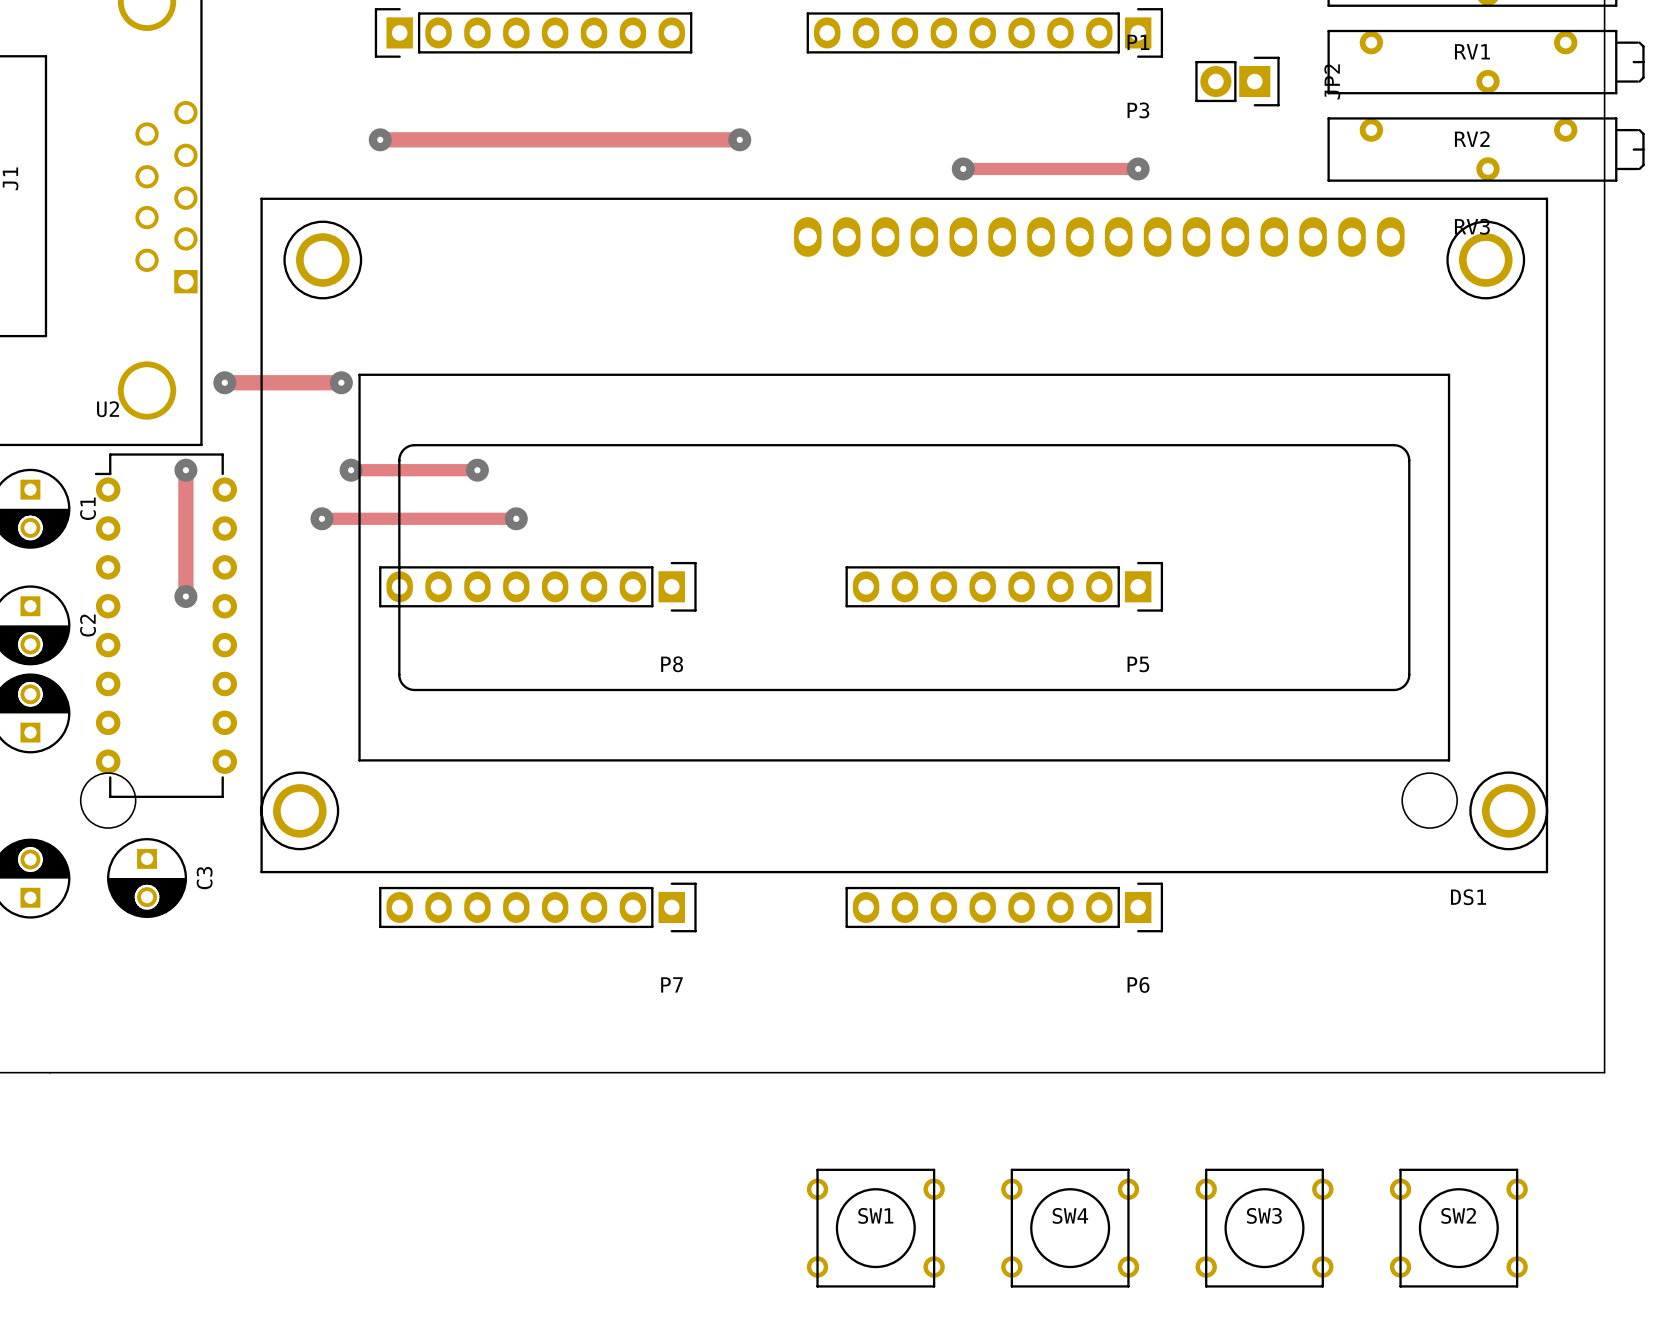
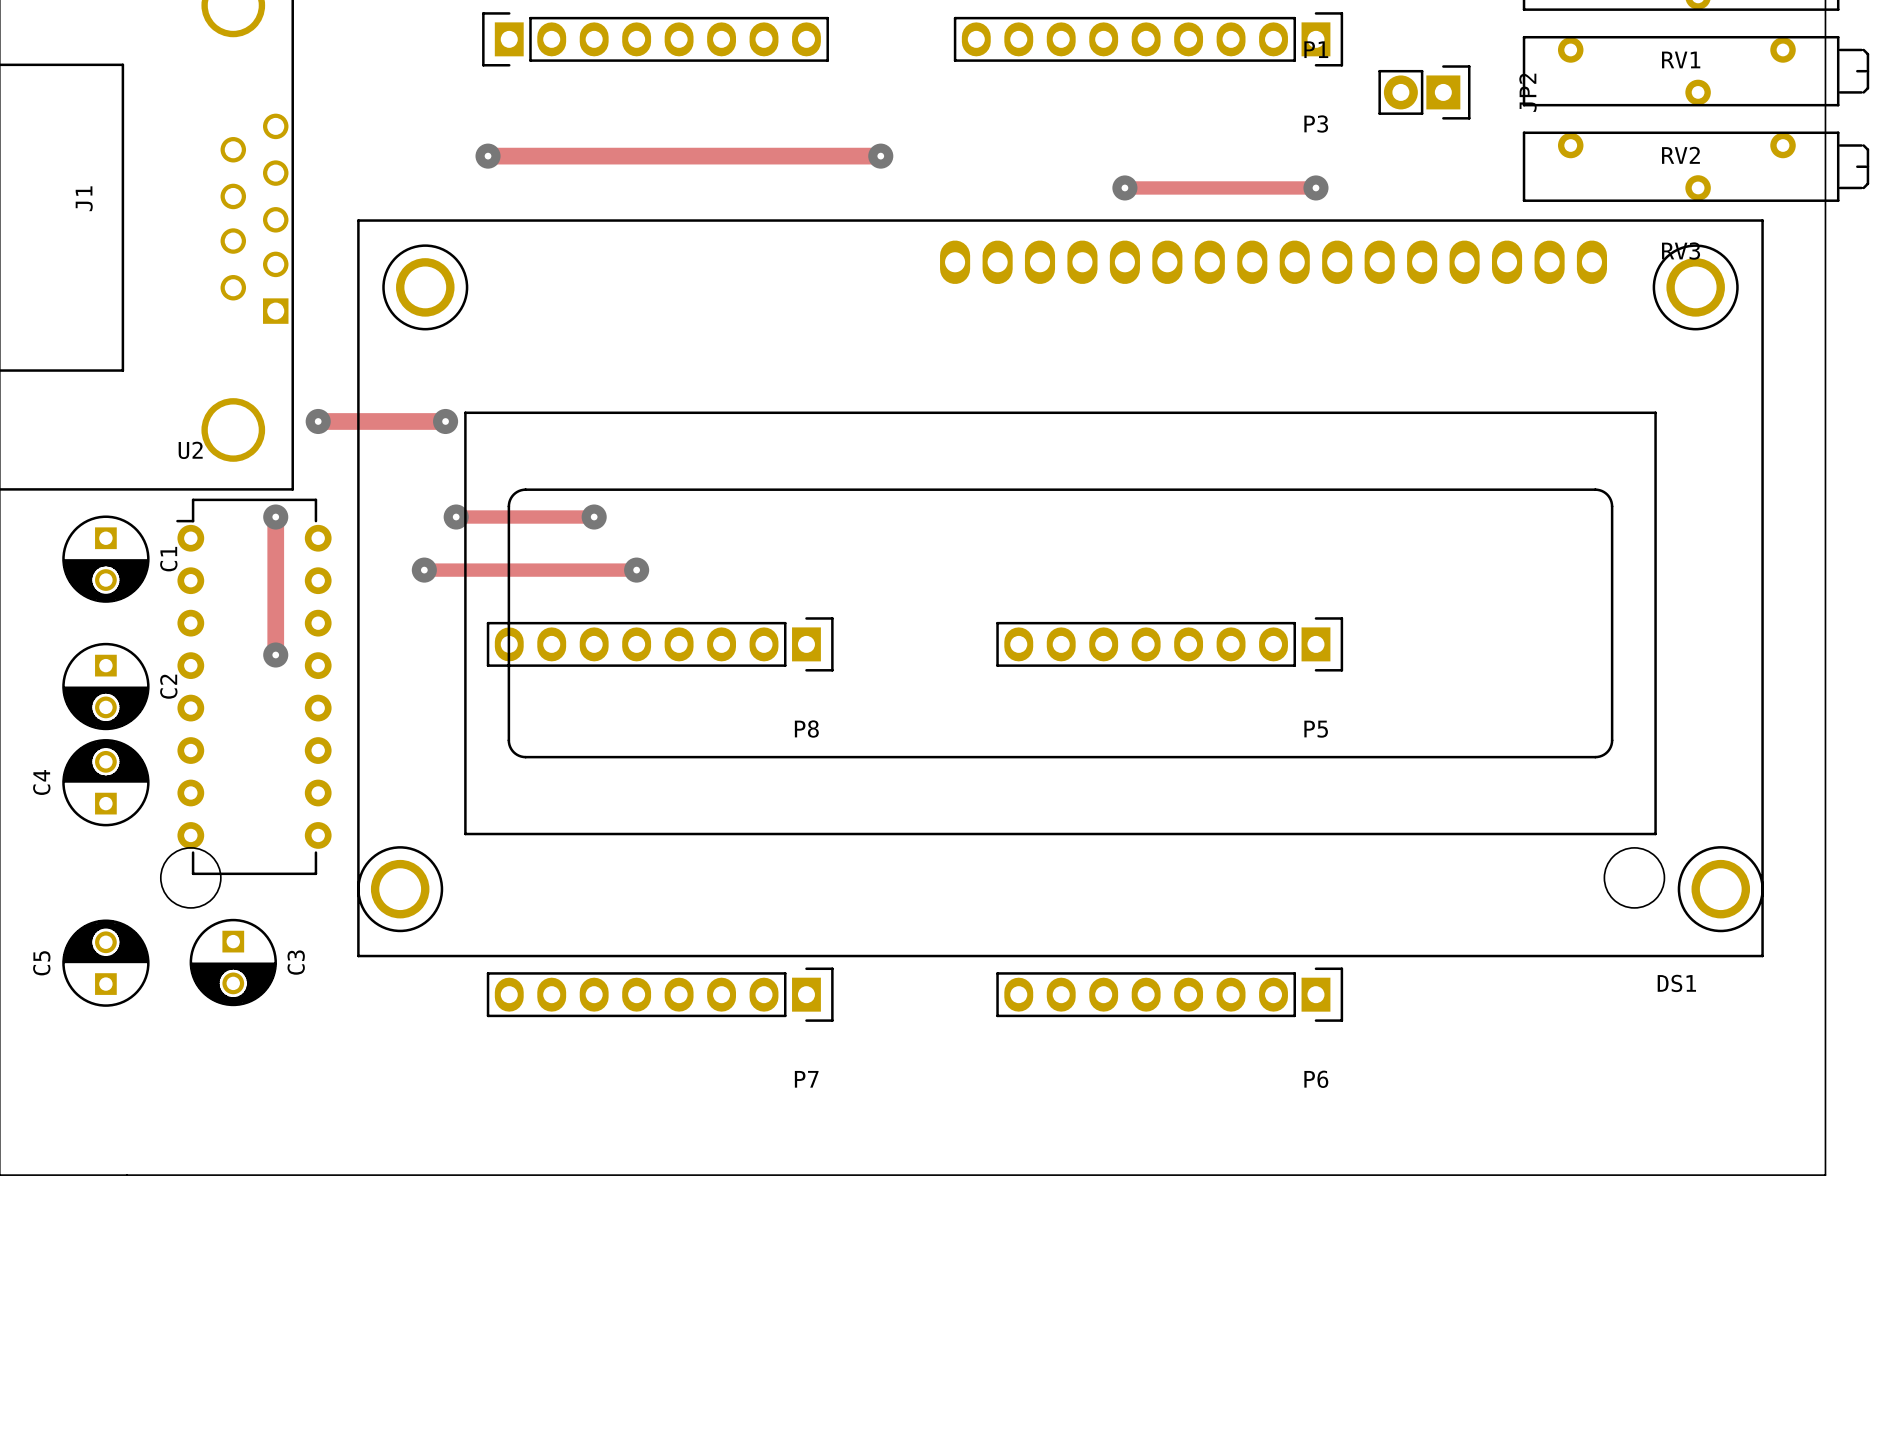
SW1: (875, 1228) -> none
SW4: (1070, 1228) -> none
SW3: (1264, 1228) -> none
SW2: (1458, 1228) -> none

